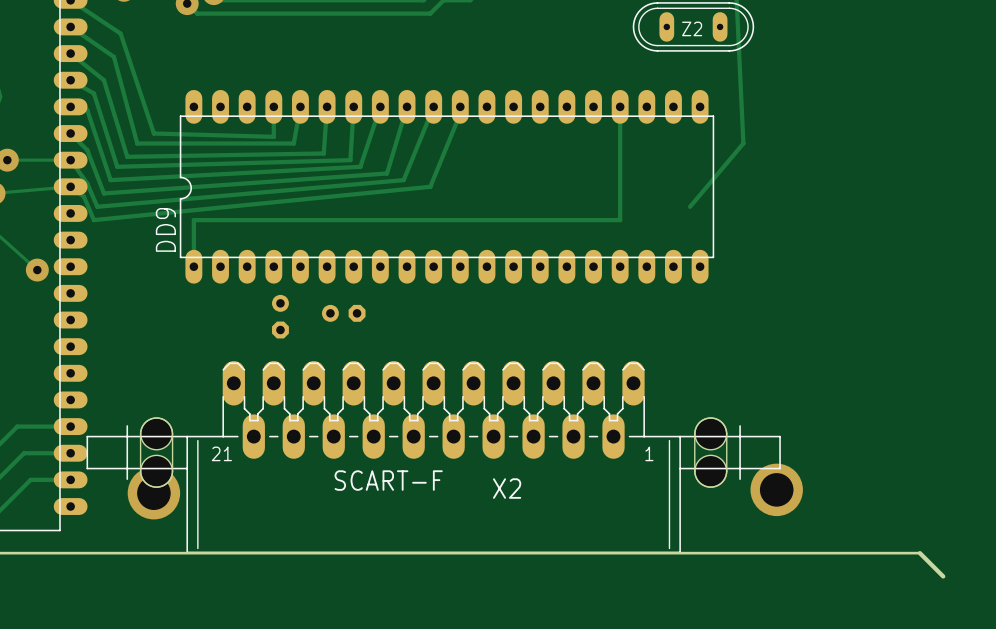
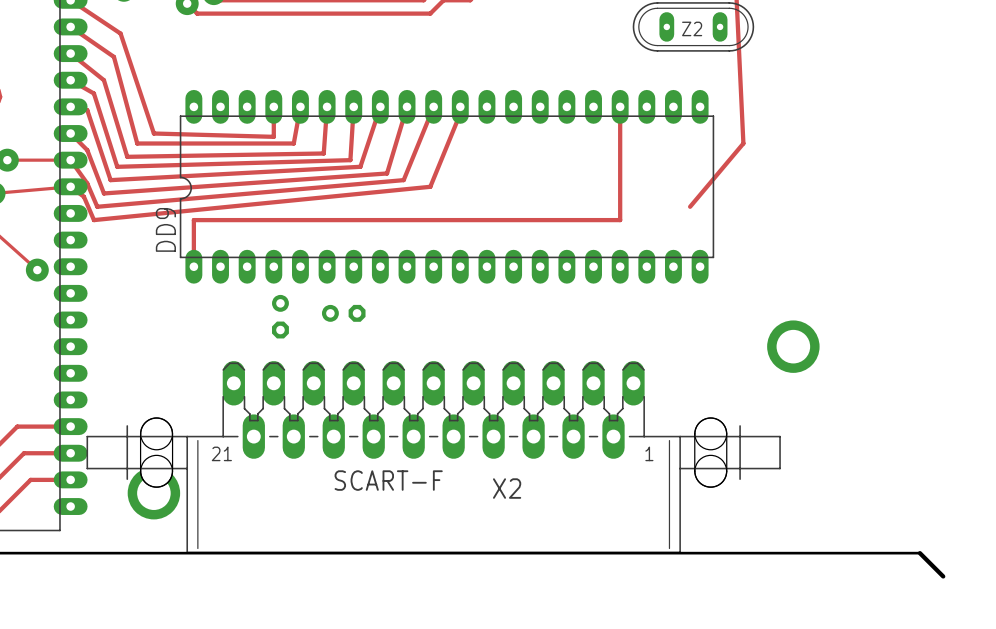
via: none -> (793, 346)
via: (776, 489) -> none

